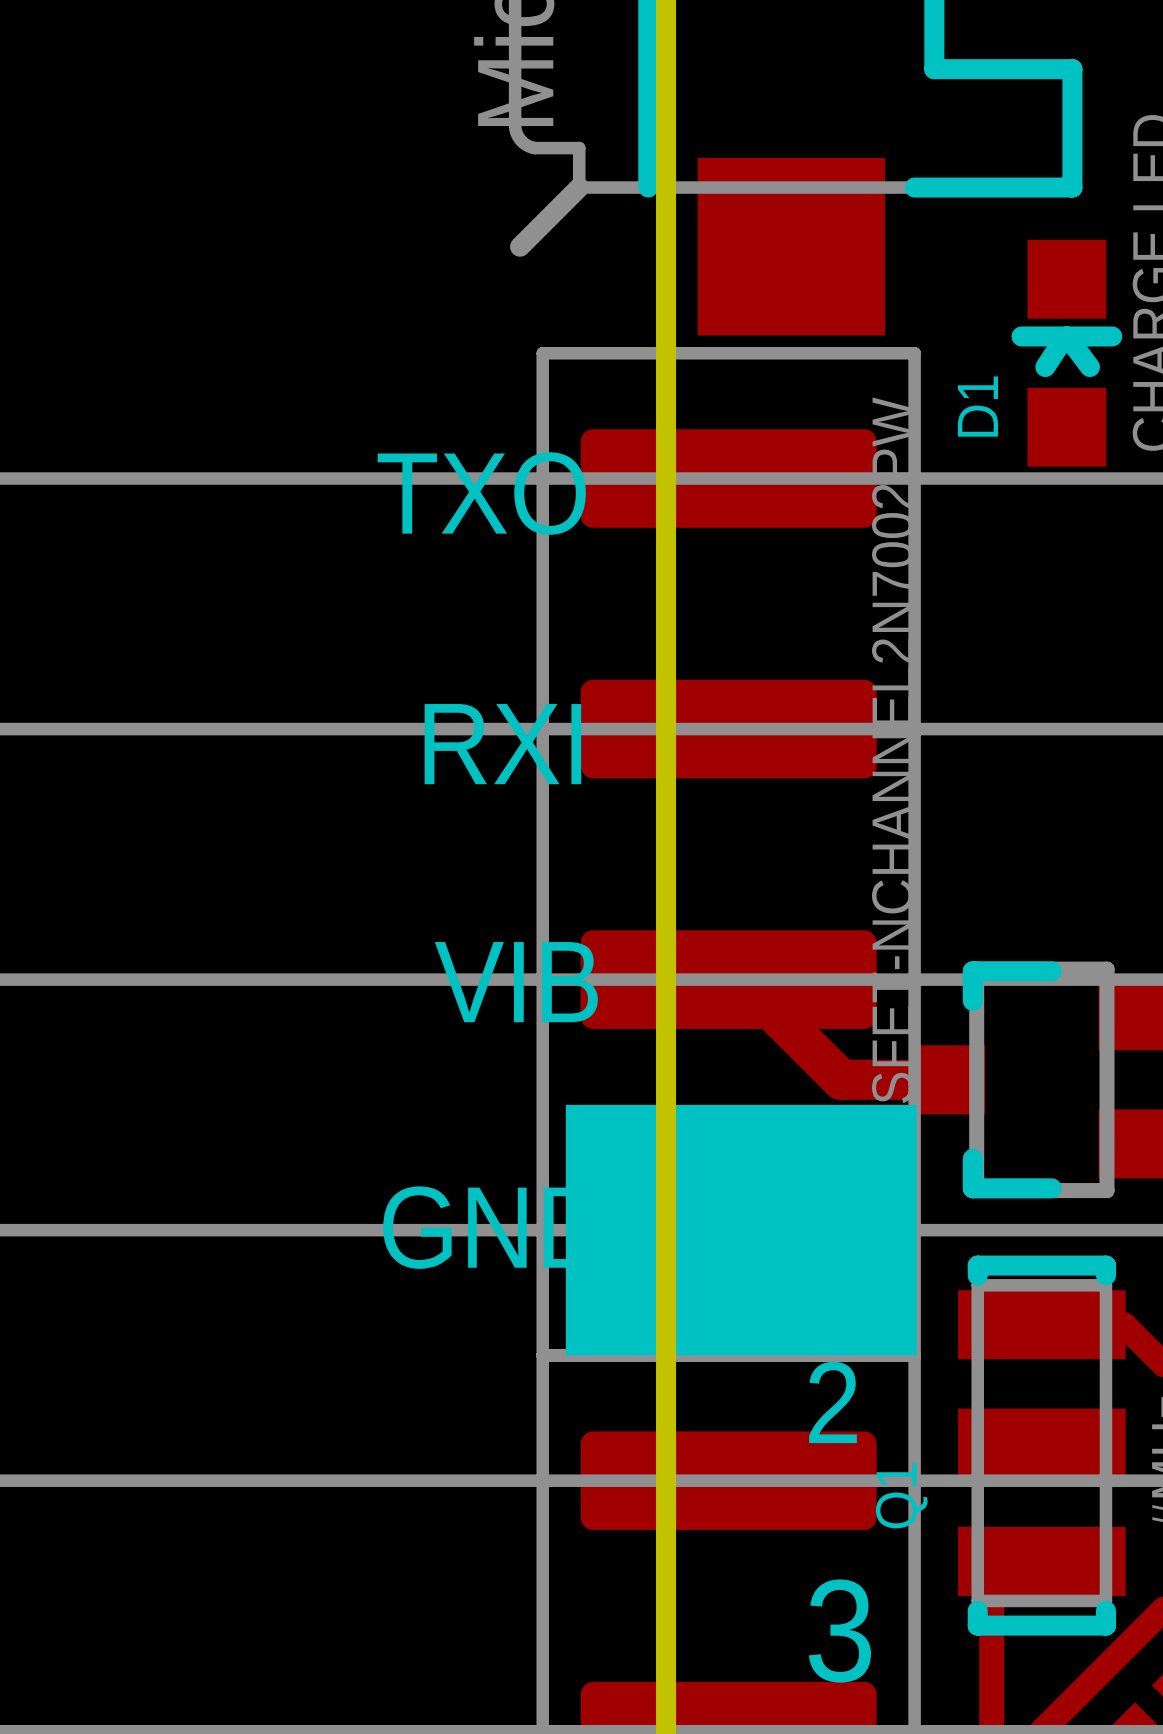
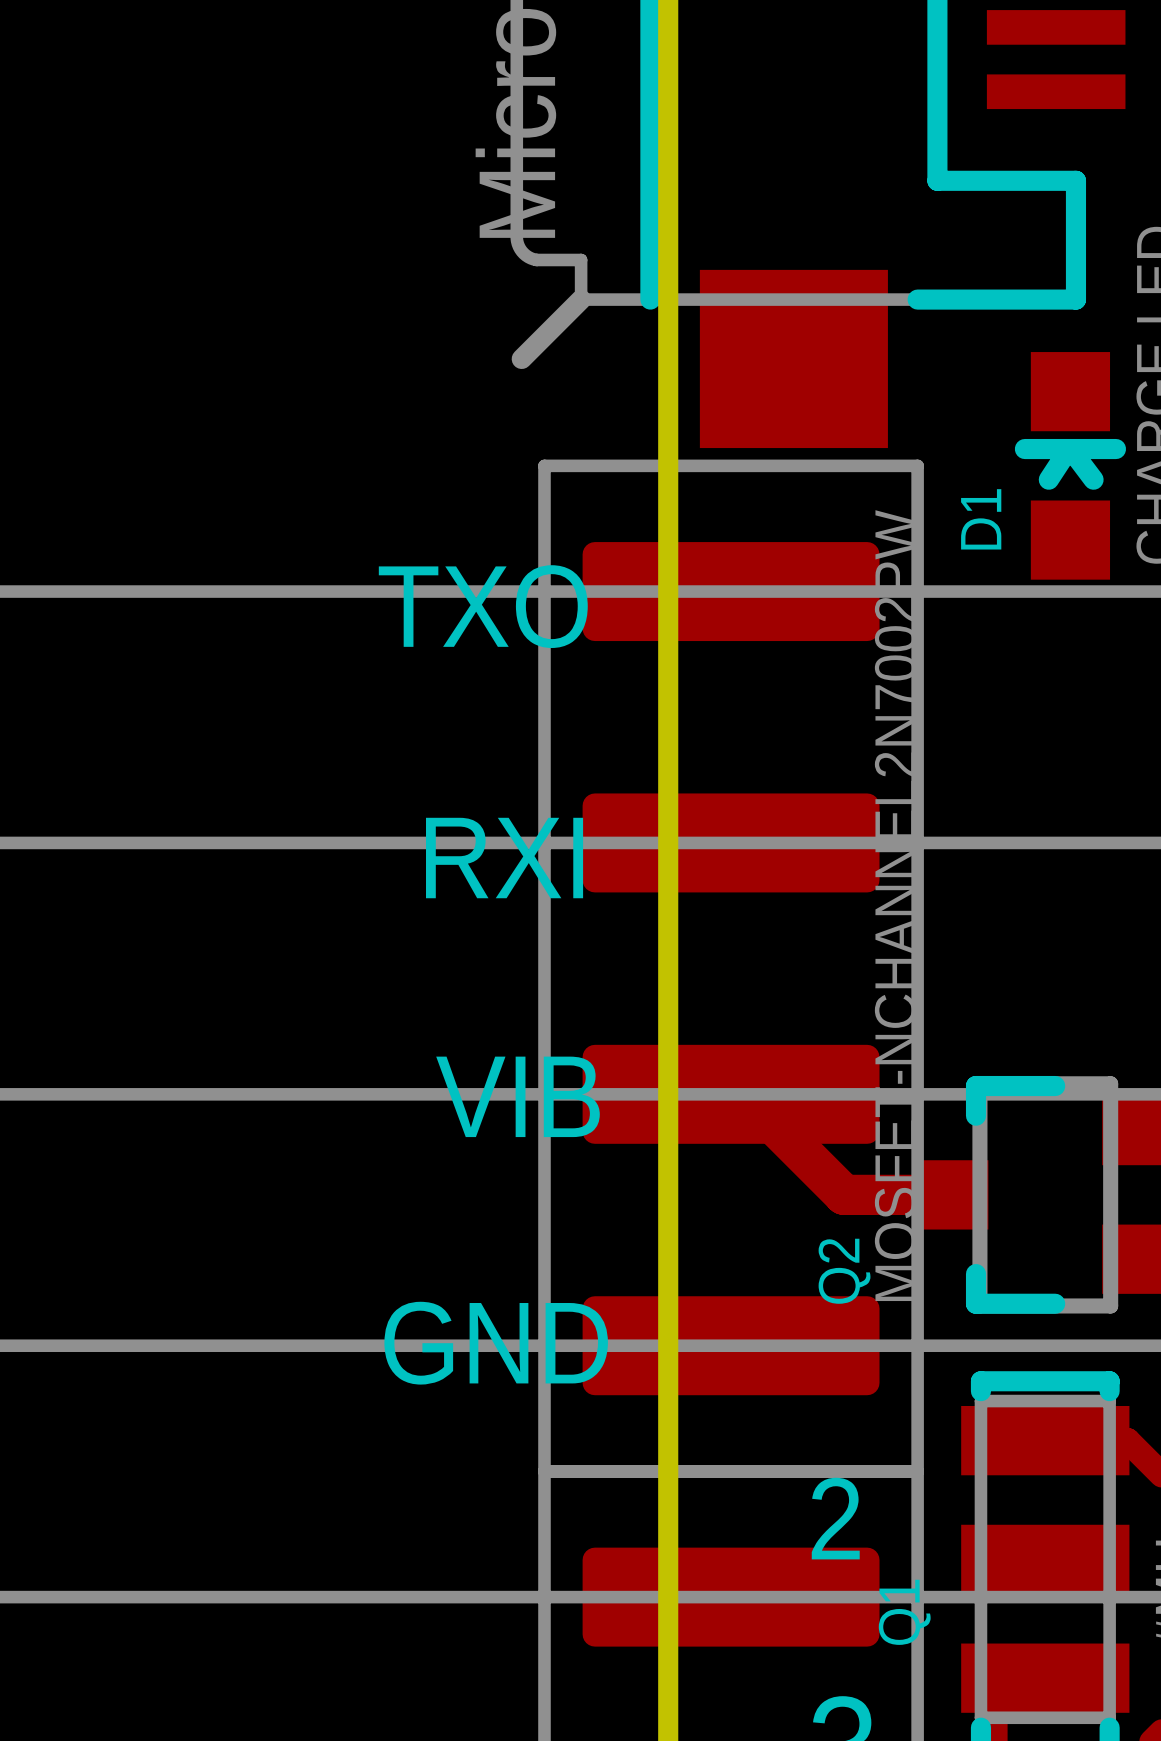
drawing: [565, 1104, 917, 1356] -> none

